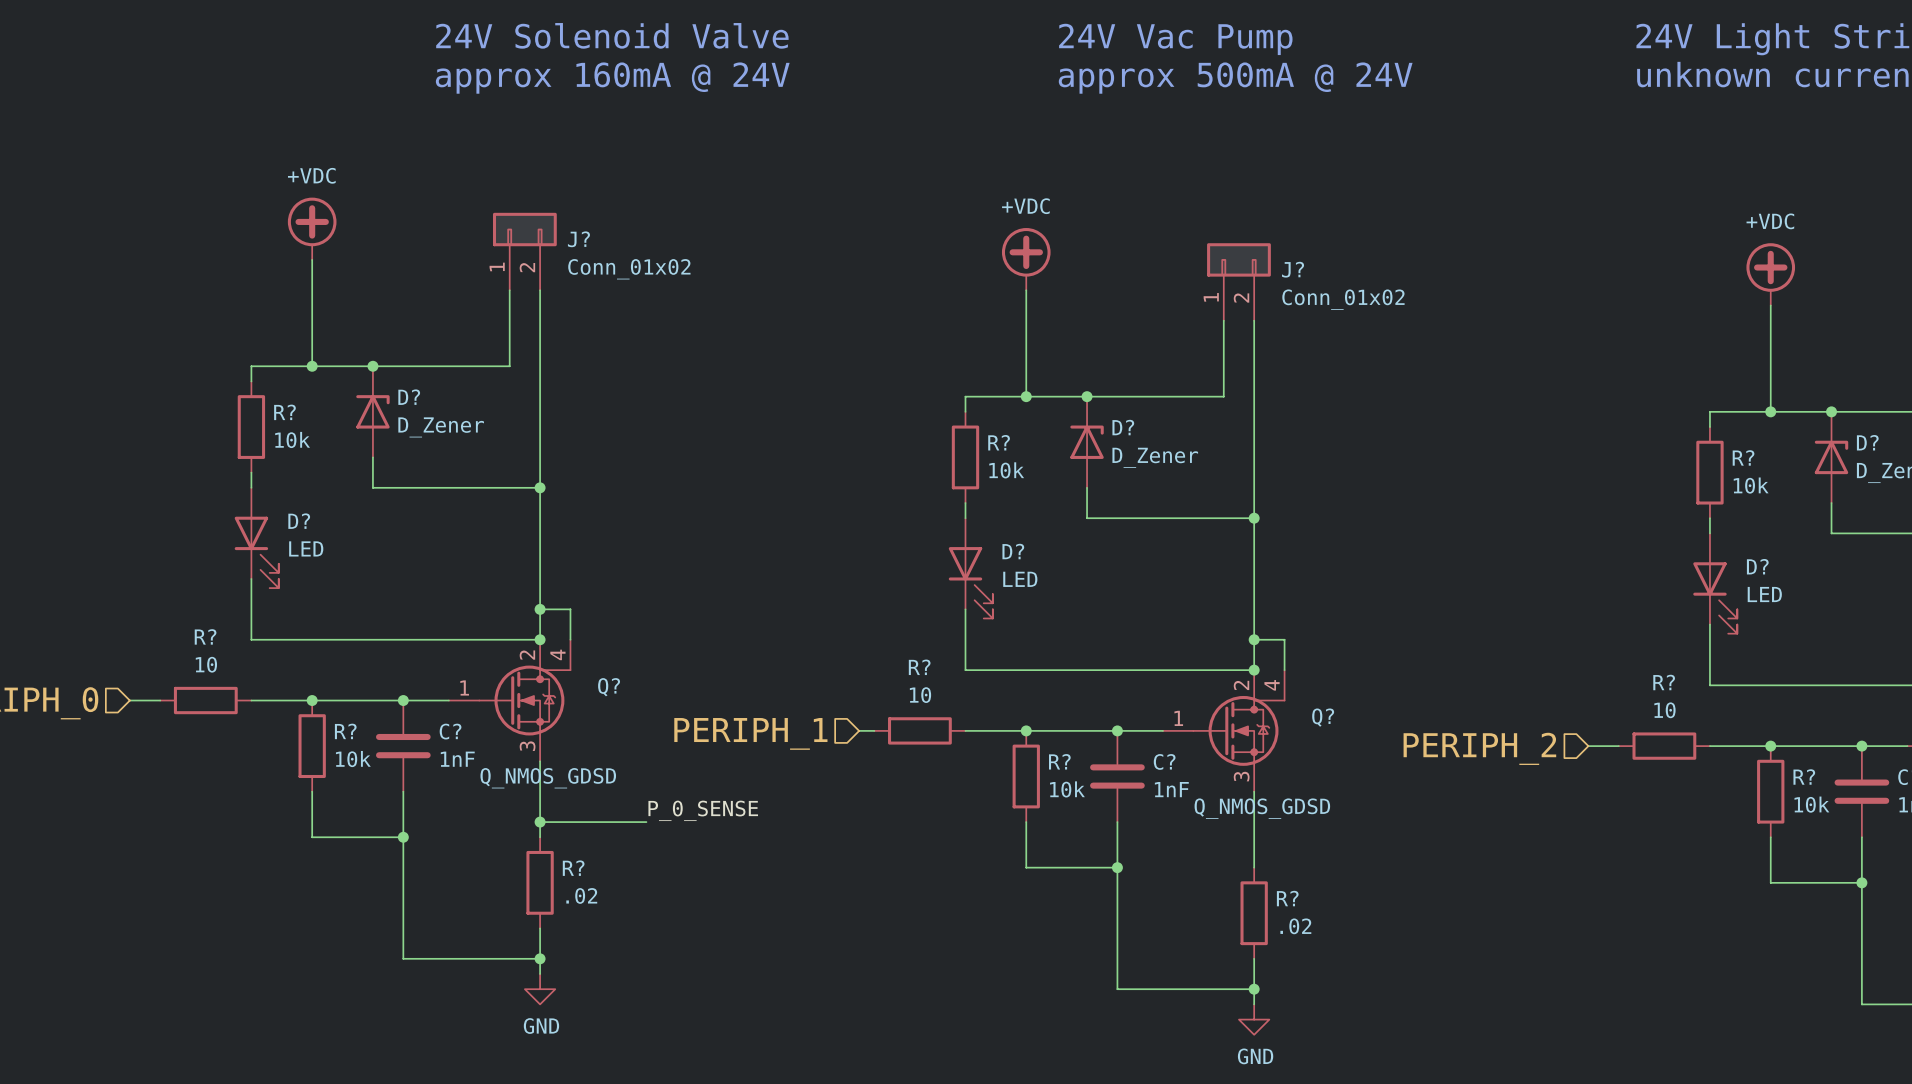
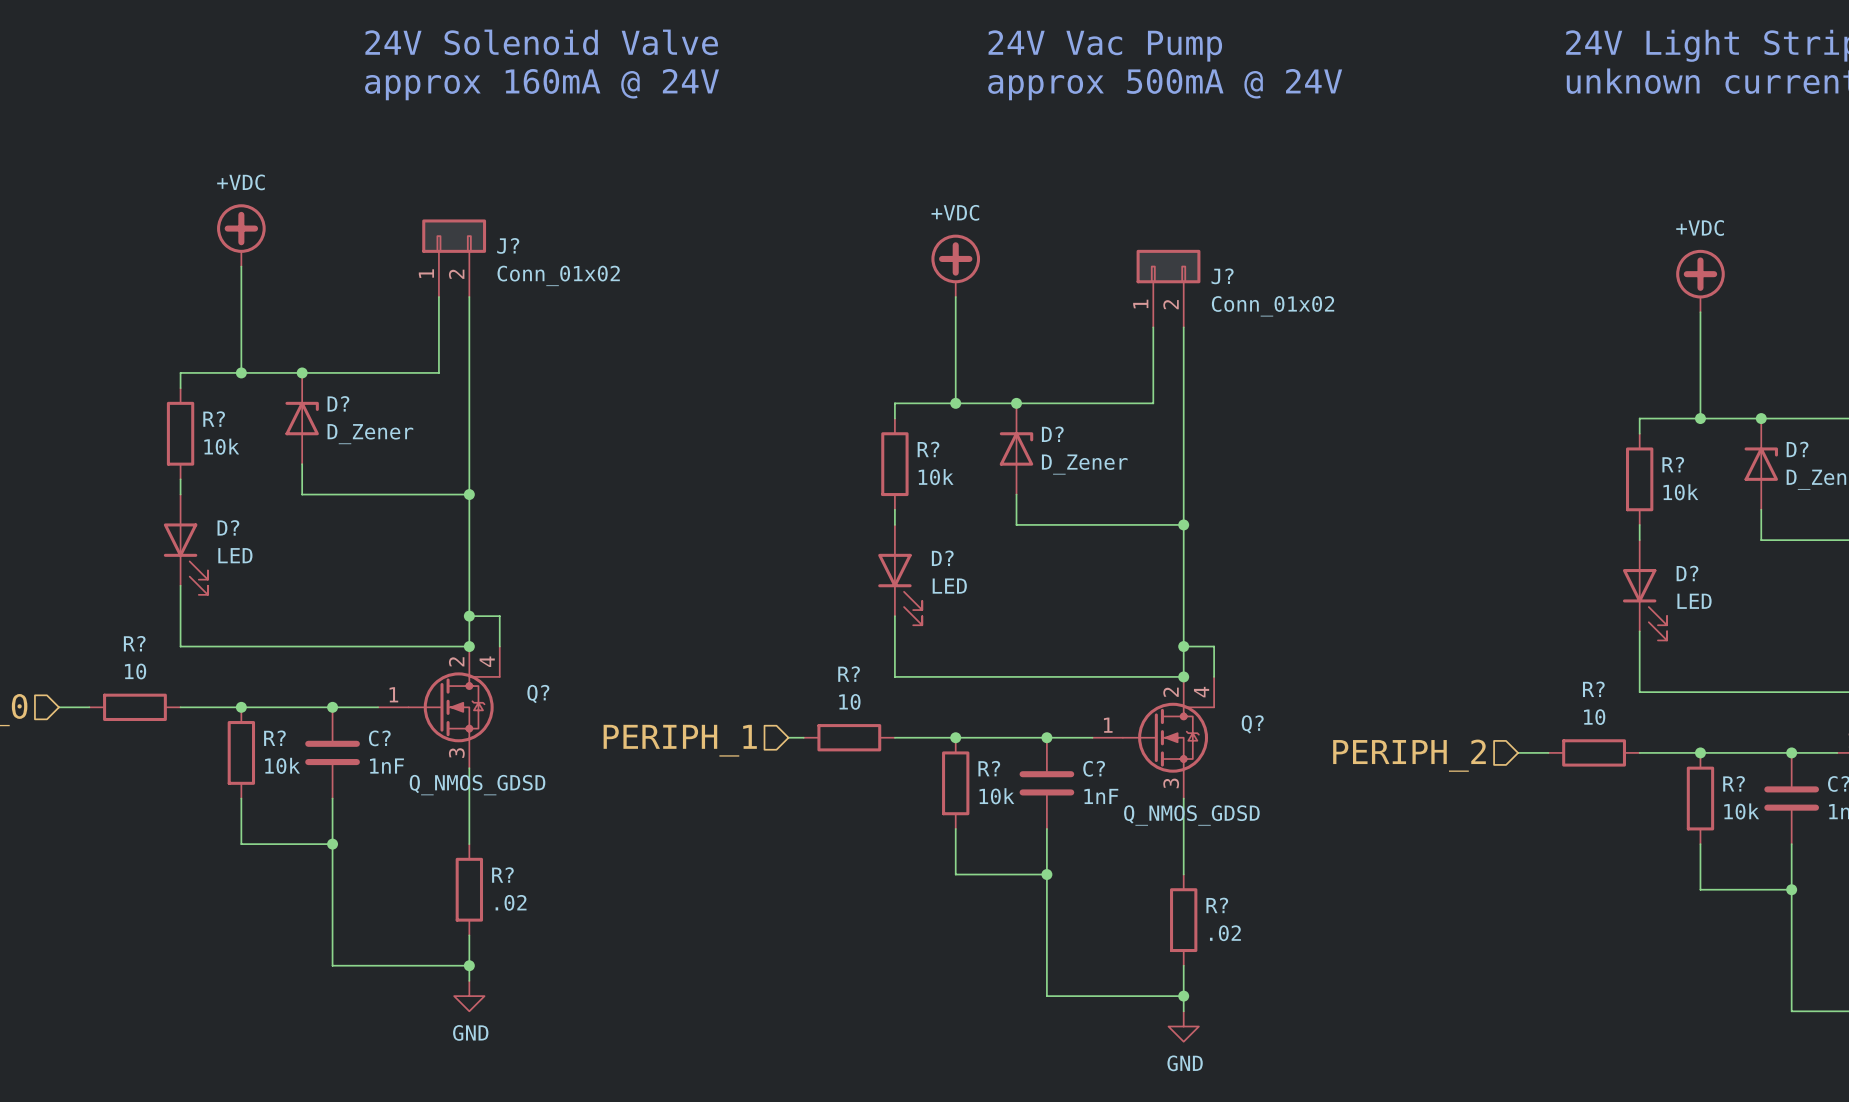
label: P_0_SENSE (703, 810) -> none
wire: (540, 822) (646, 822) -> none
junction: (540, 822) -> none

